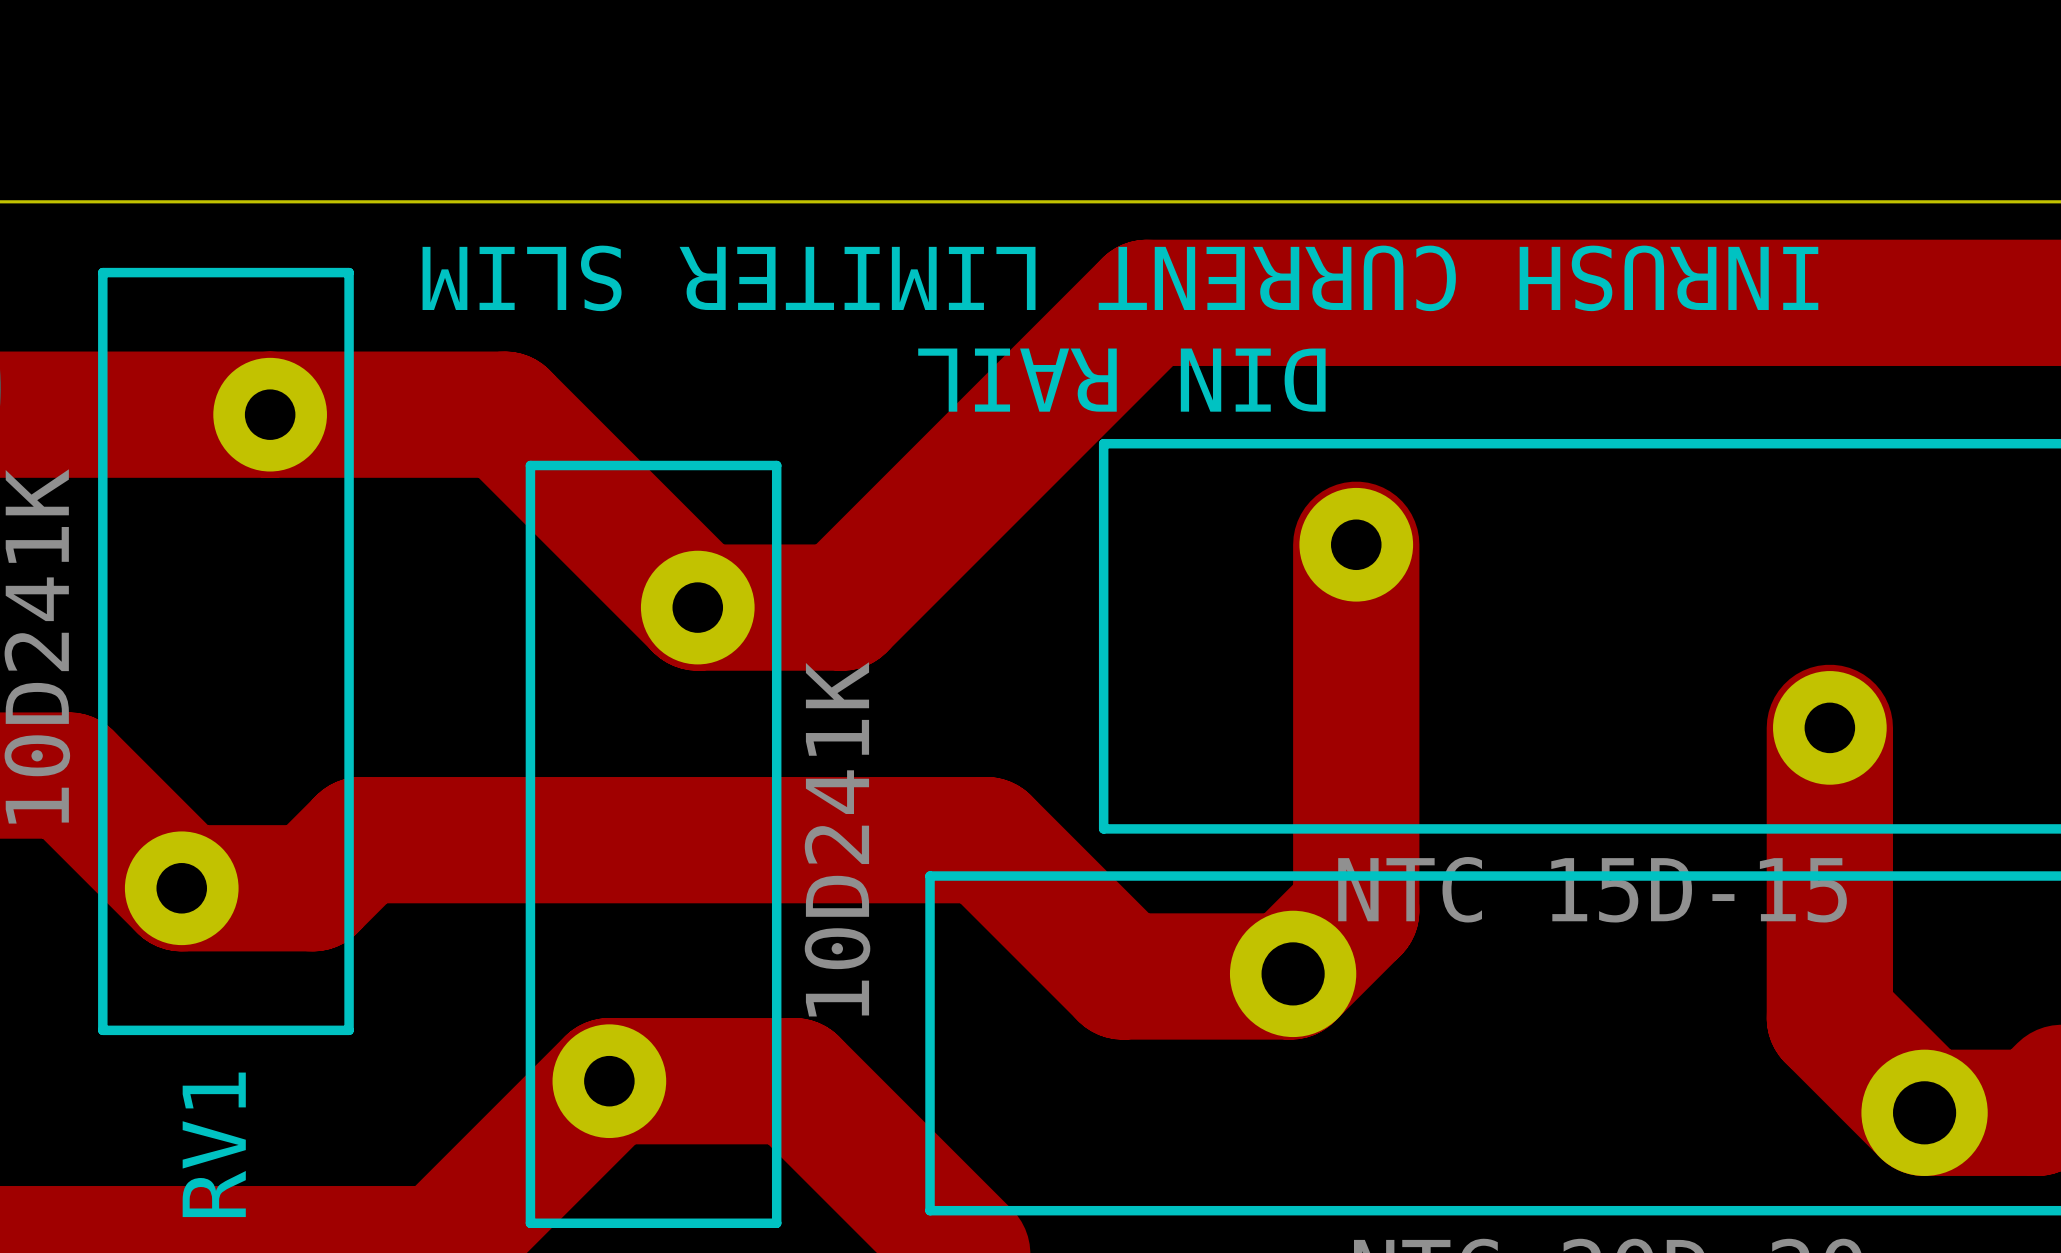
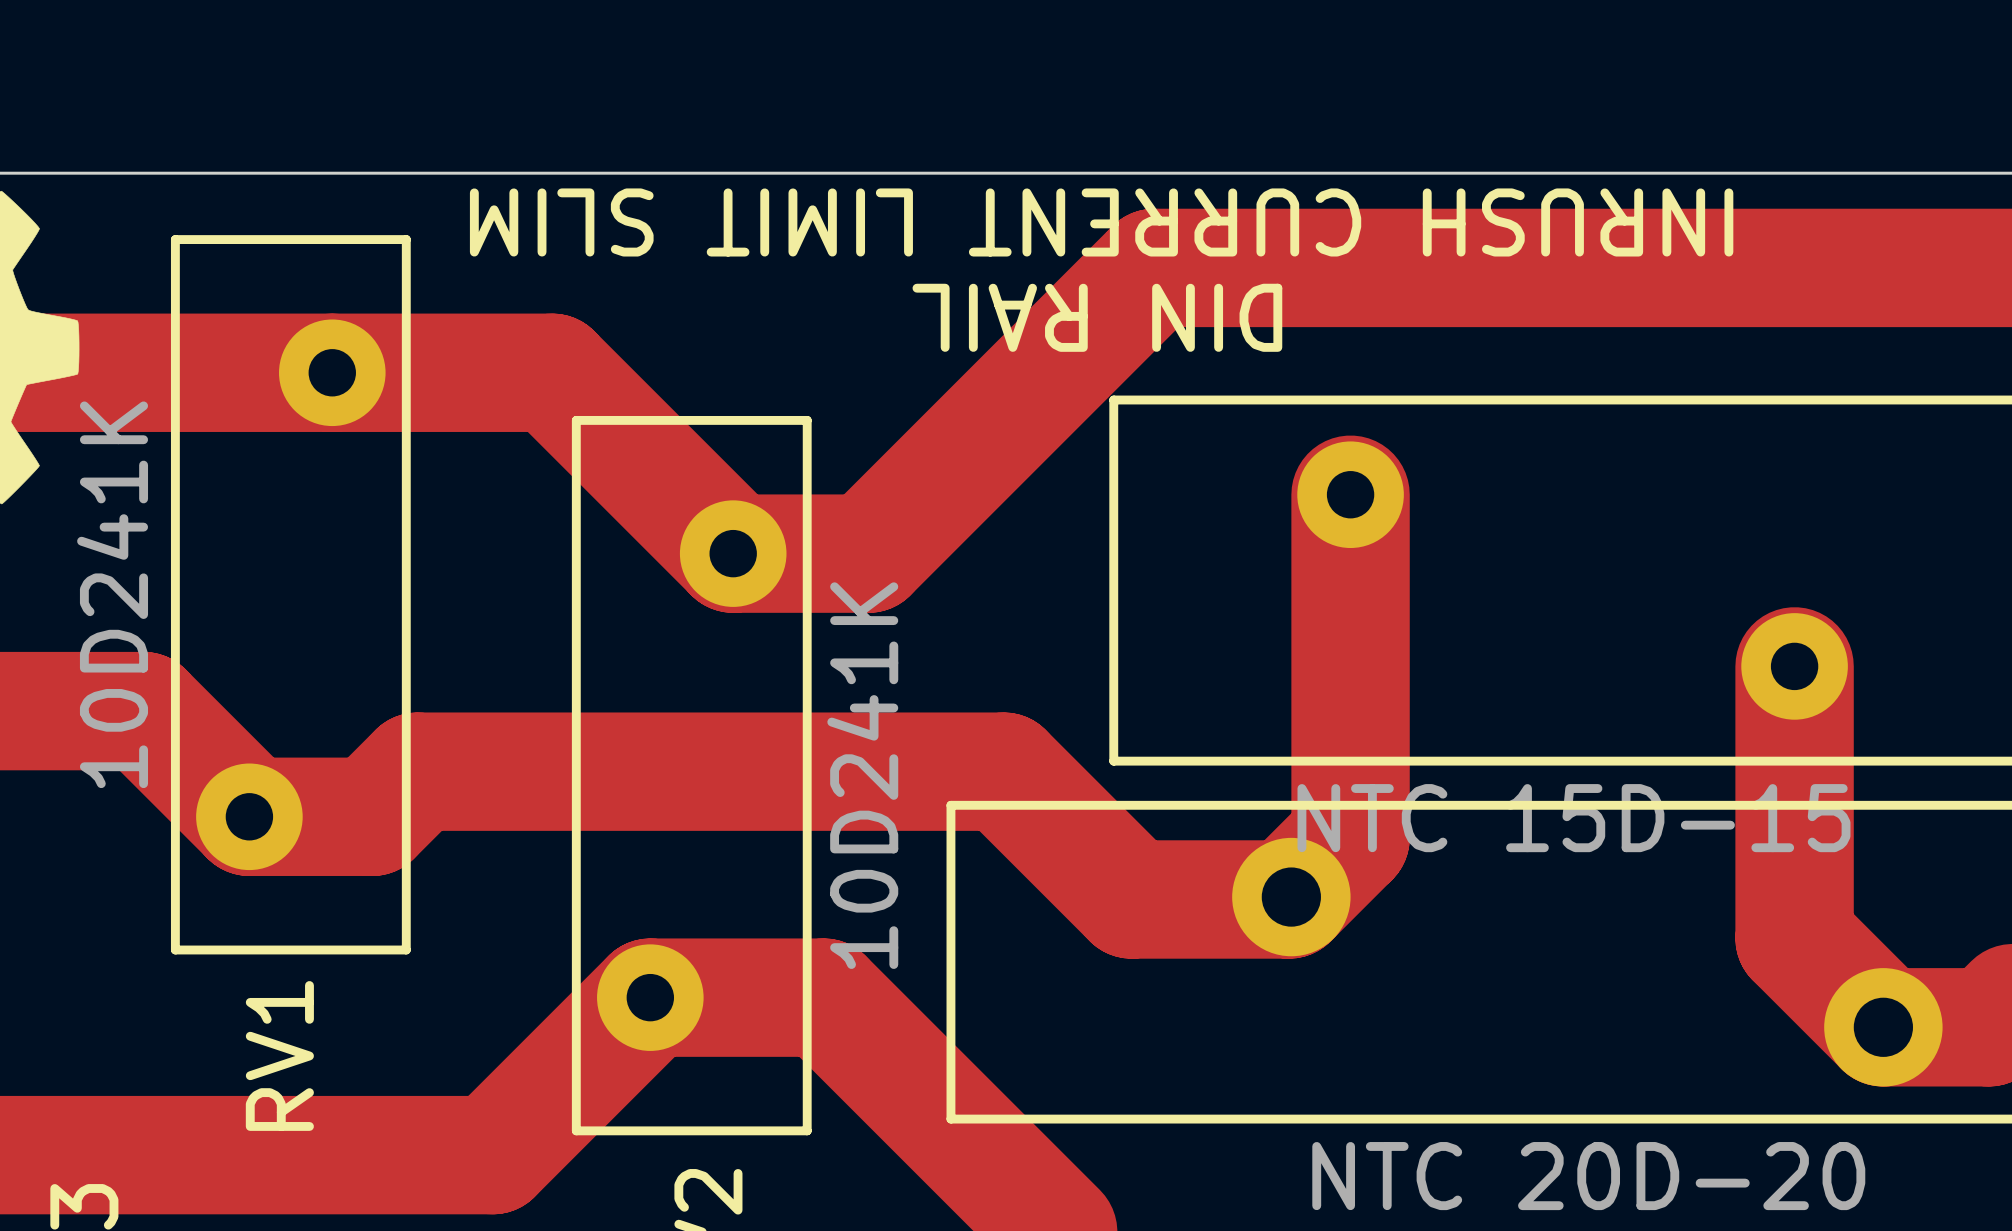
text: INRUSH CURRENT LIMITER SLIM (1120, 278) -> INRUSH CURRENT LIMIT SLIM (1101, 222)
text position: DIN RAIL (1121, 380) -> DIN RAIL (1097, 317)

